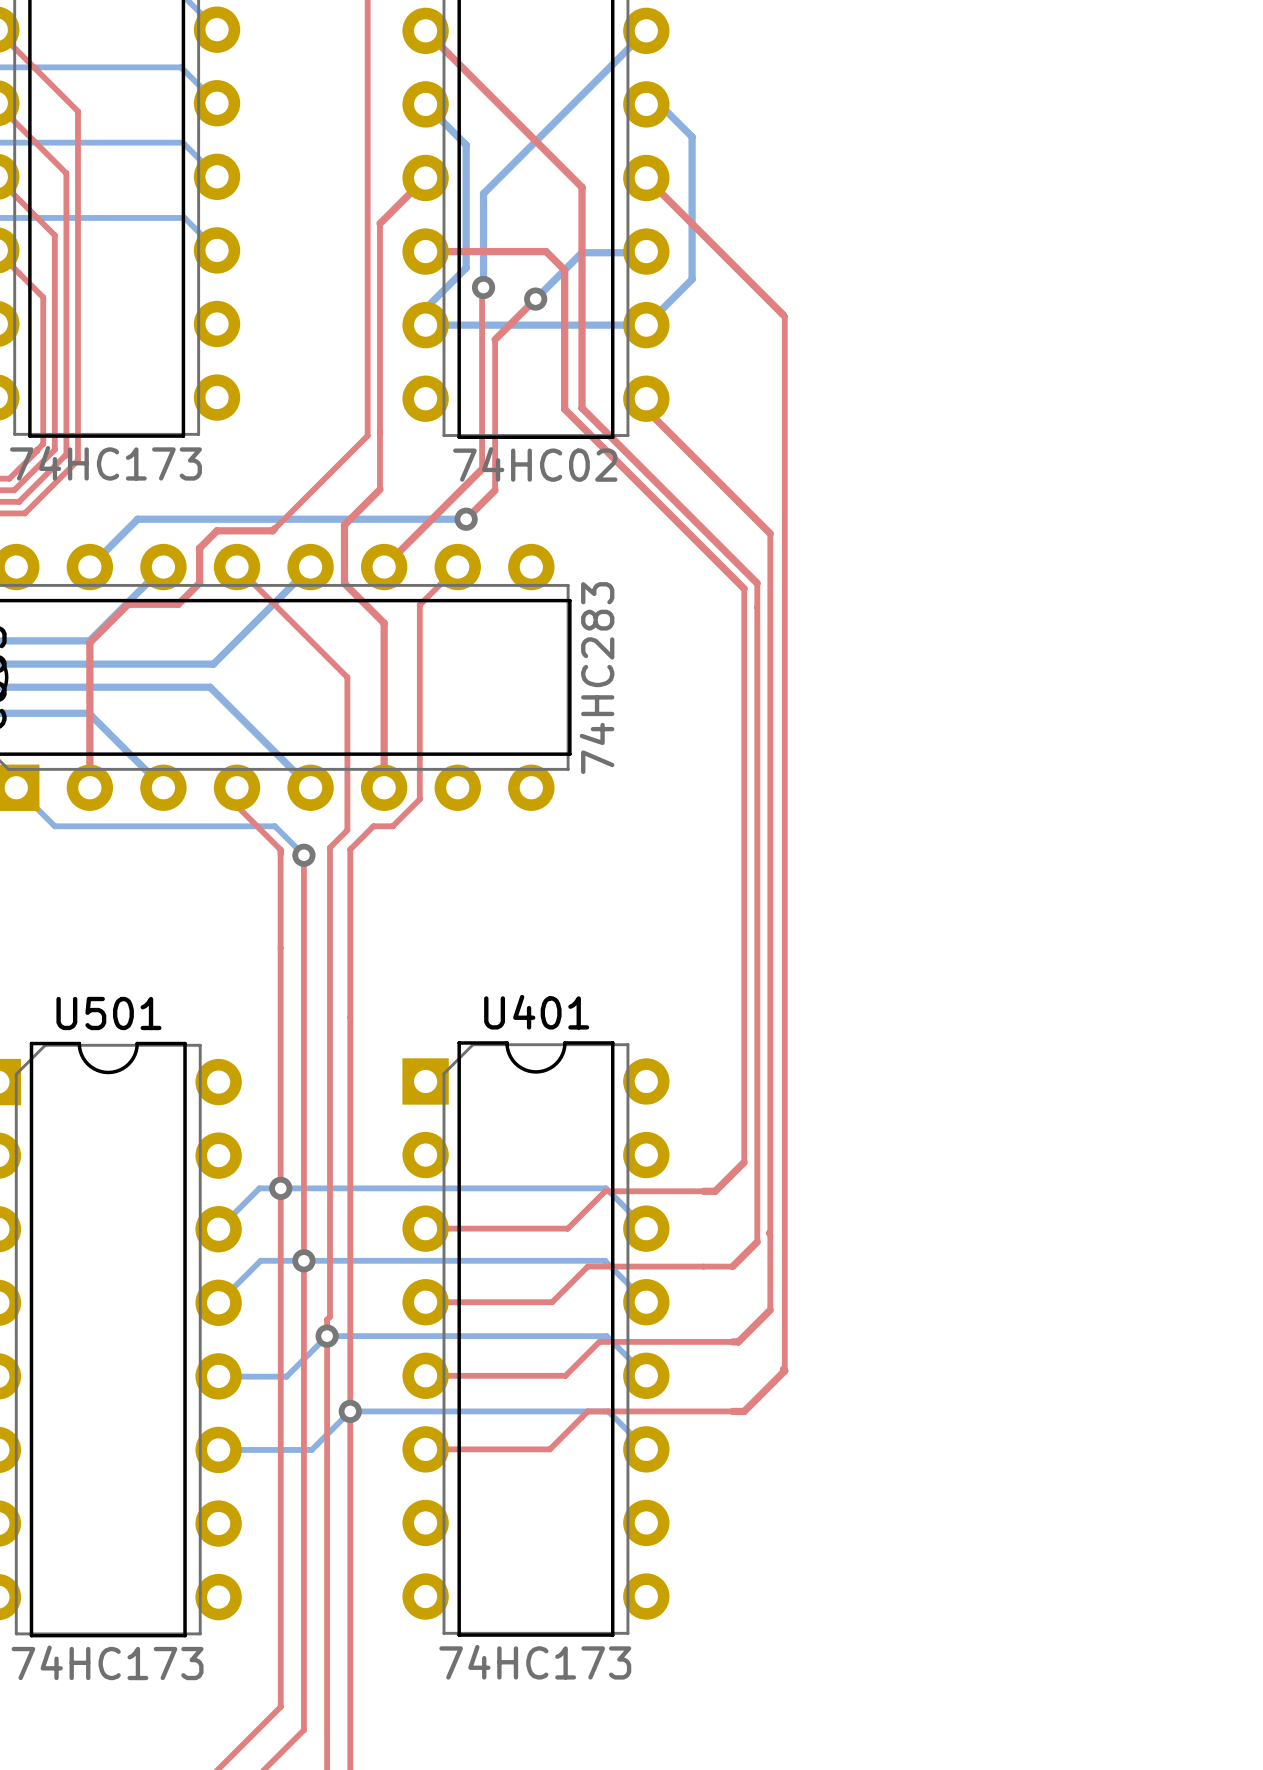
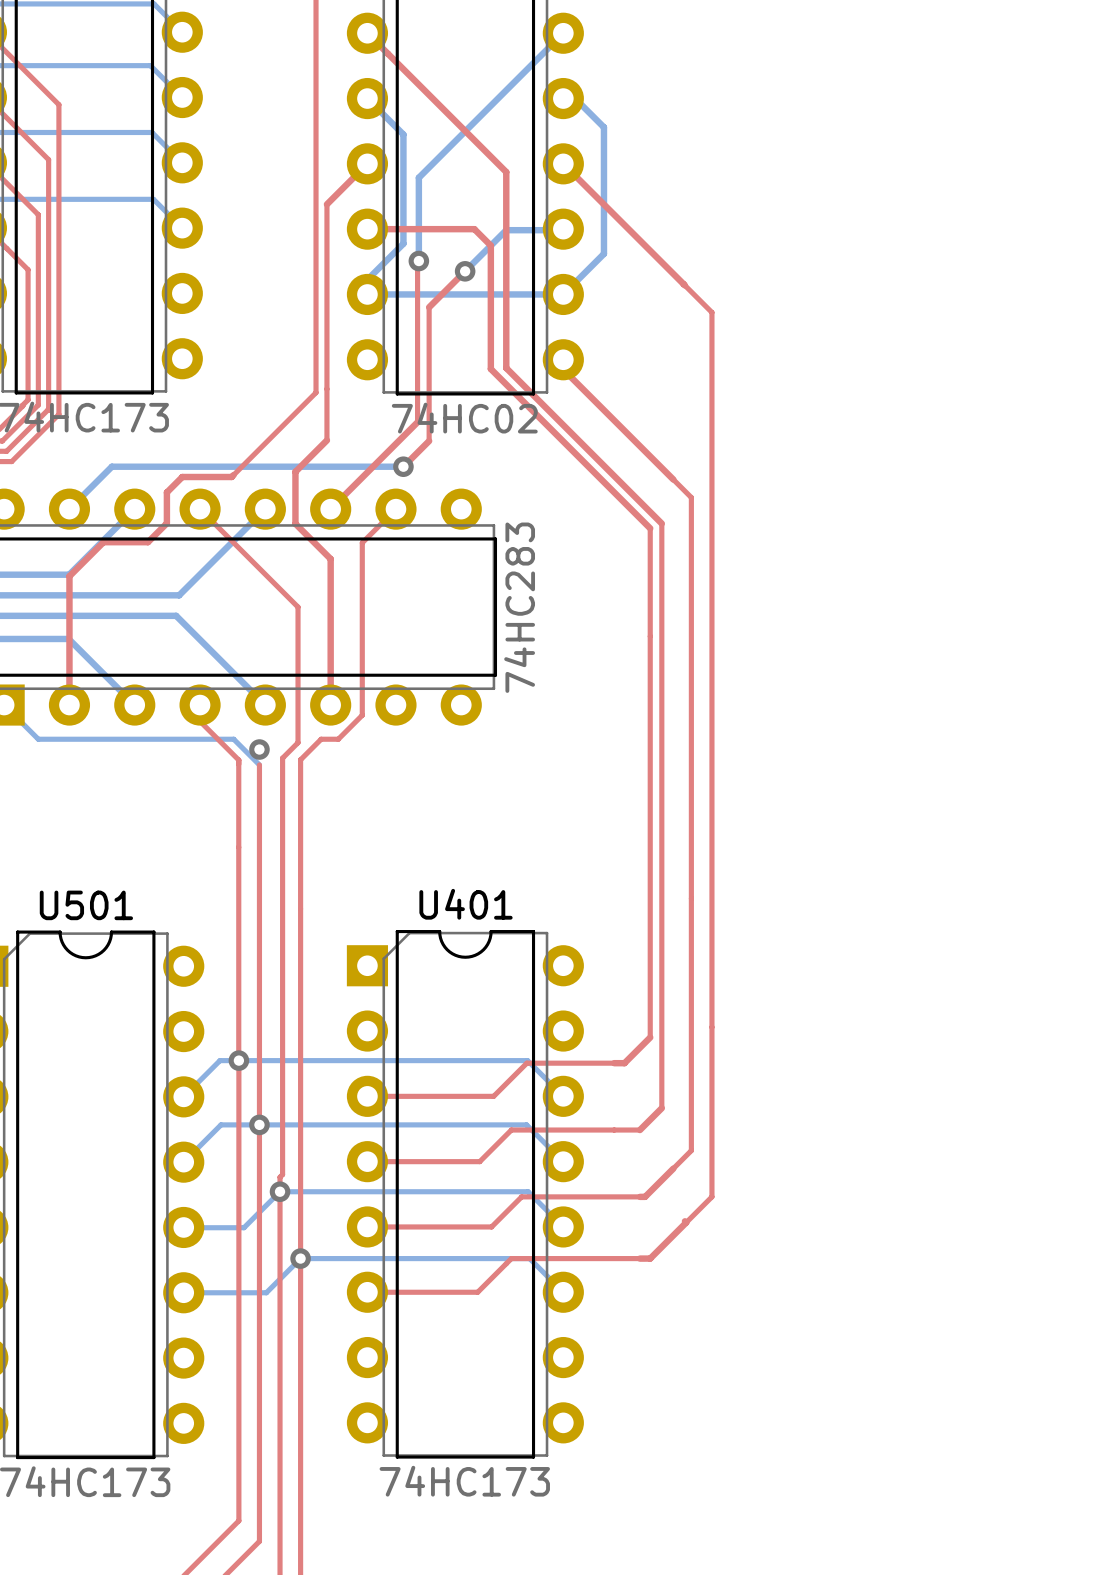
top track: (784, 316) (784, 1370) -> (686, 286) (711, 312) (711, 1196) (686, 1222)
top track: (770, 533) (770, 1310) -> (673, 479) (691, 497) (691, 1150) (673, 1168)
via position: (303, 855) -> (259, 749)

